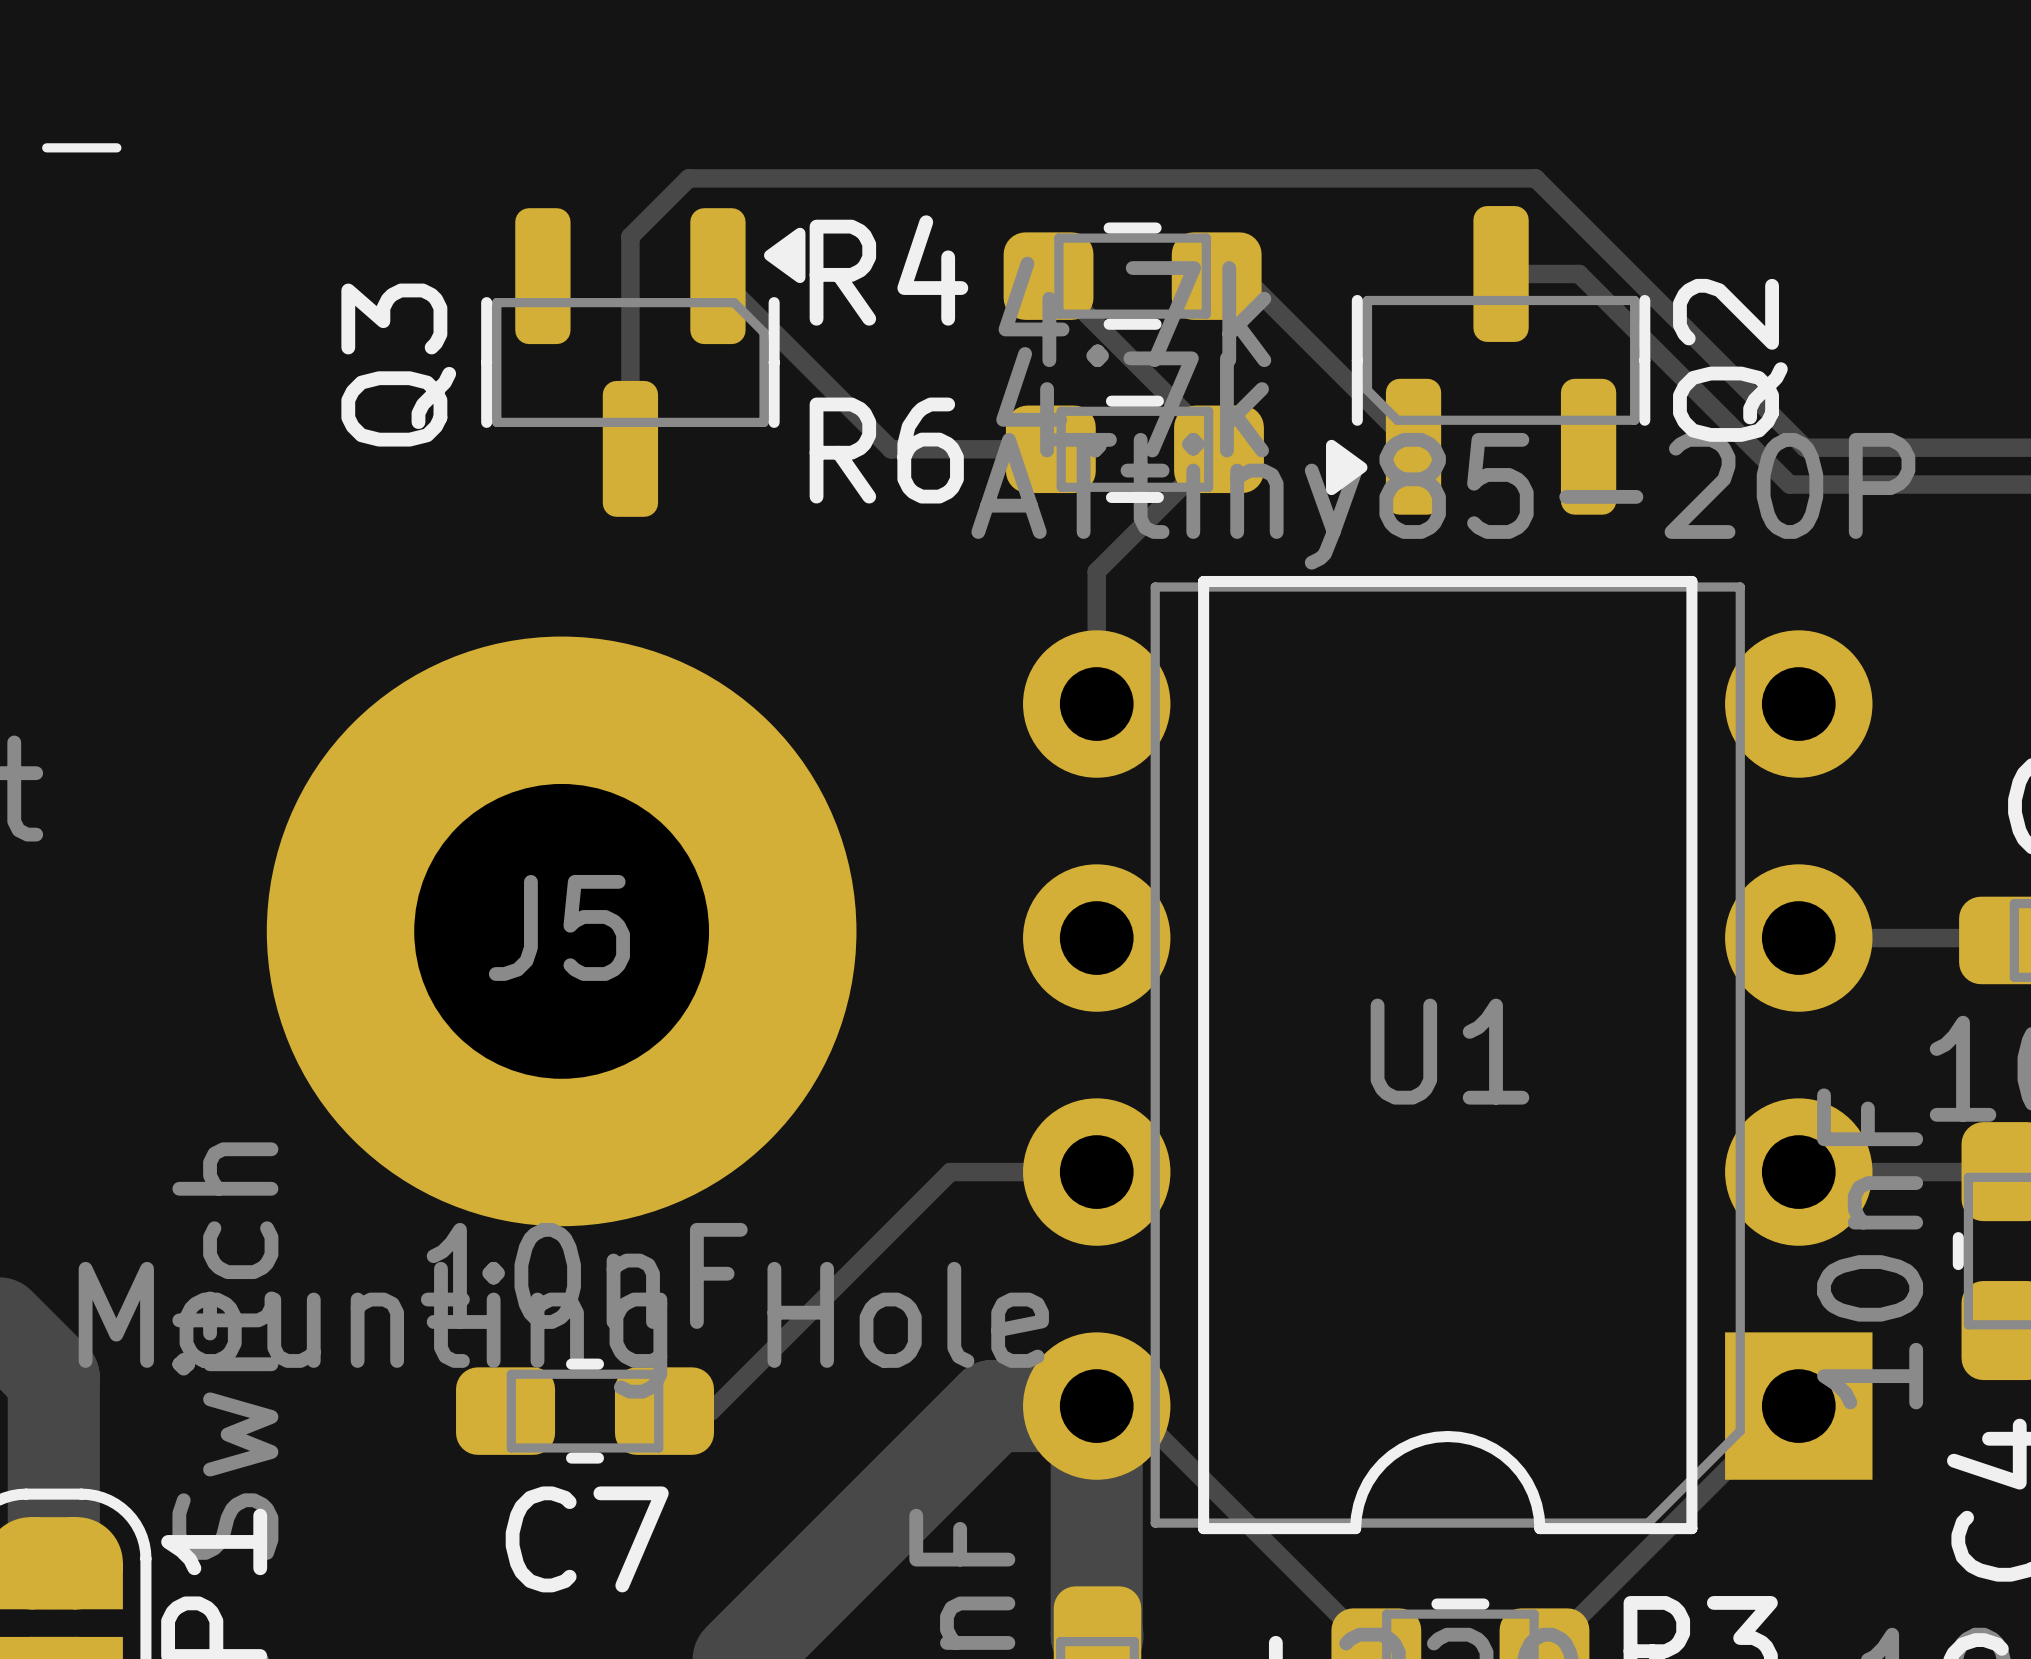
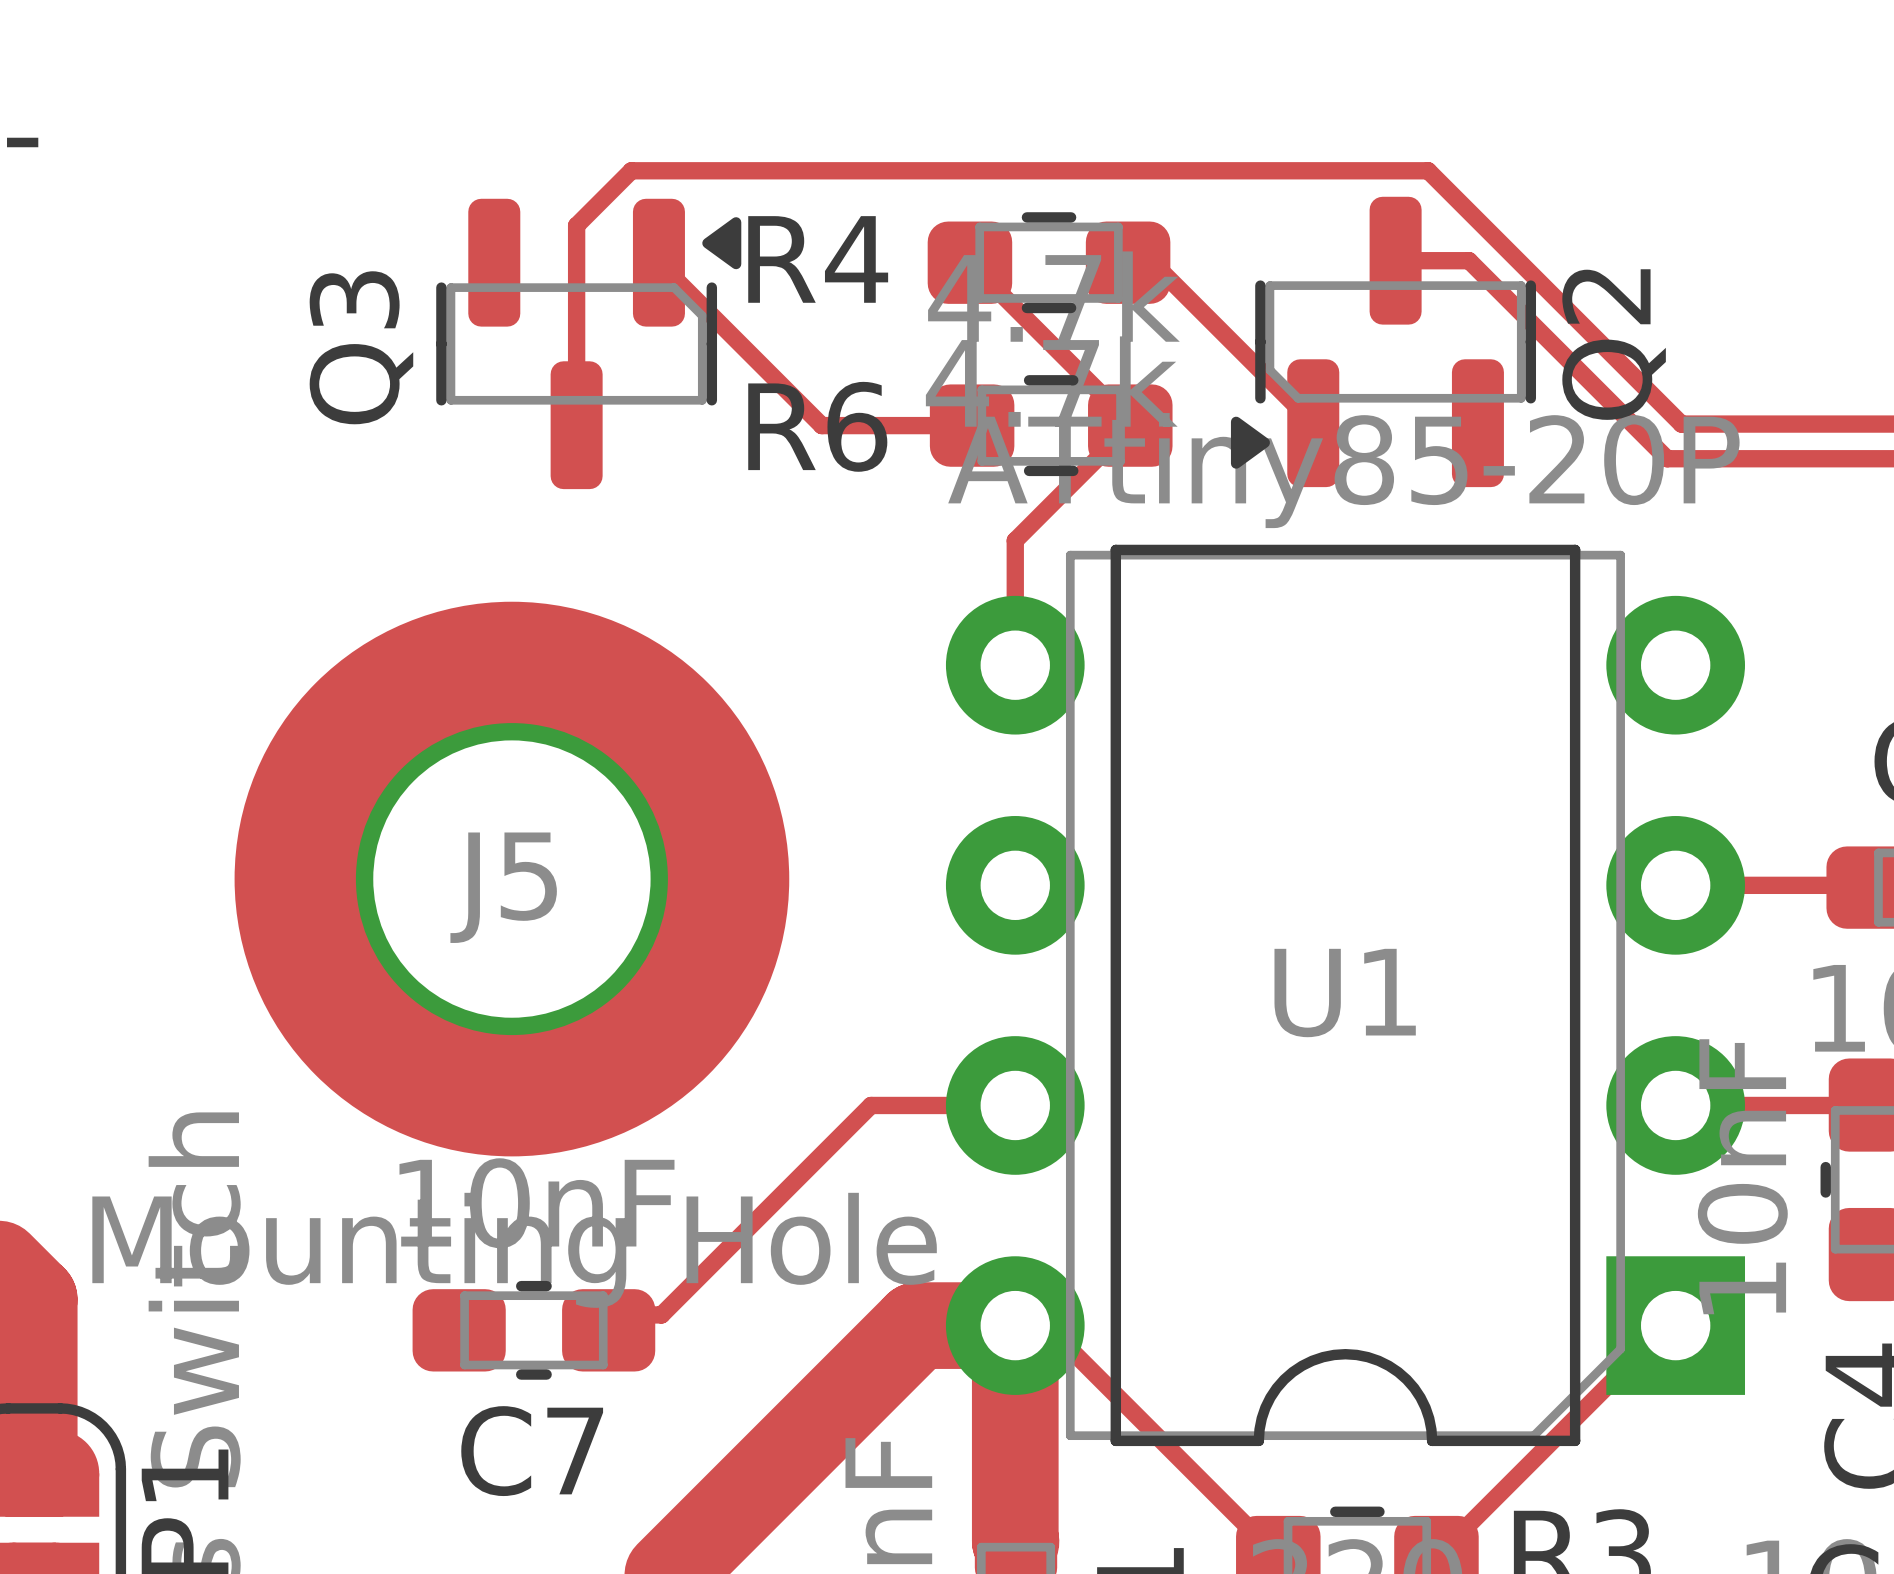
track: (950, 1172) (711, 1411) (664, 1411) -> (877, 1105) (871, 1105) (661, 1314) (608, 1314)

